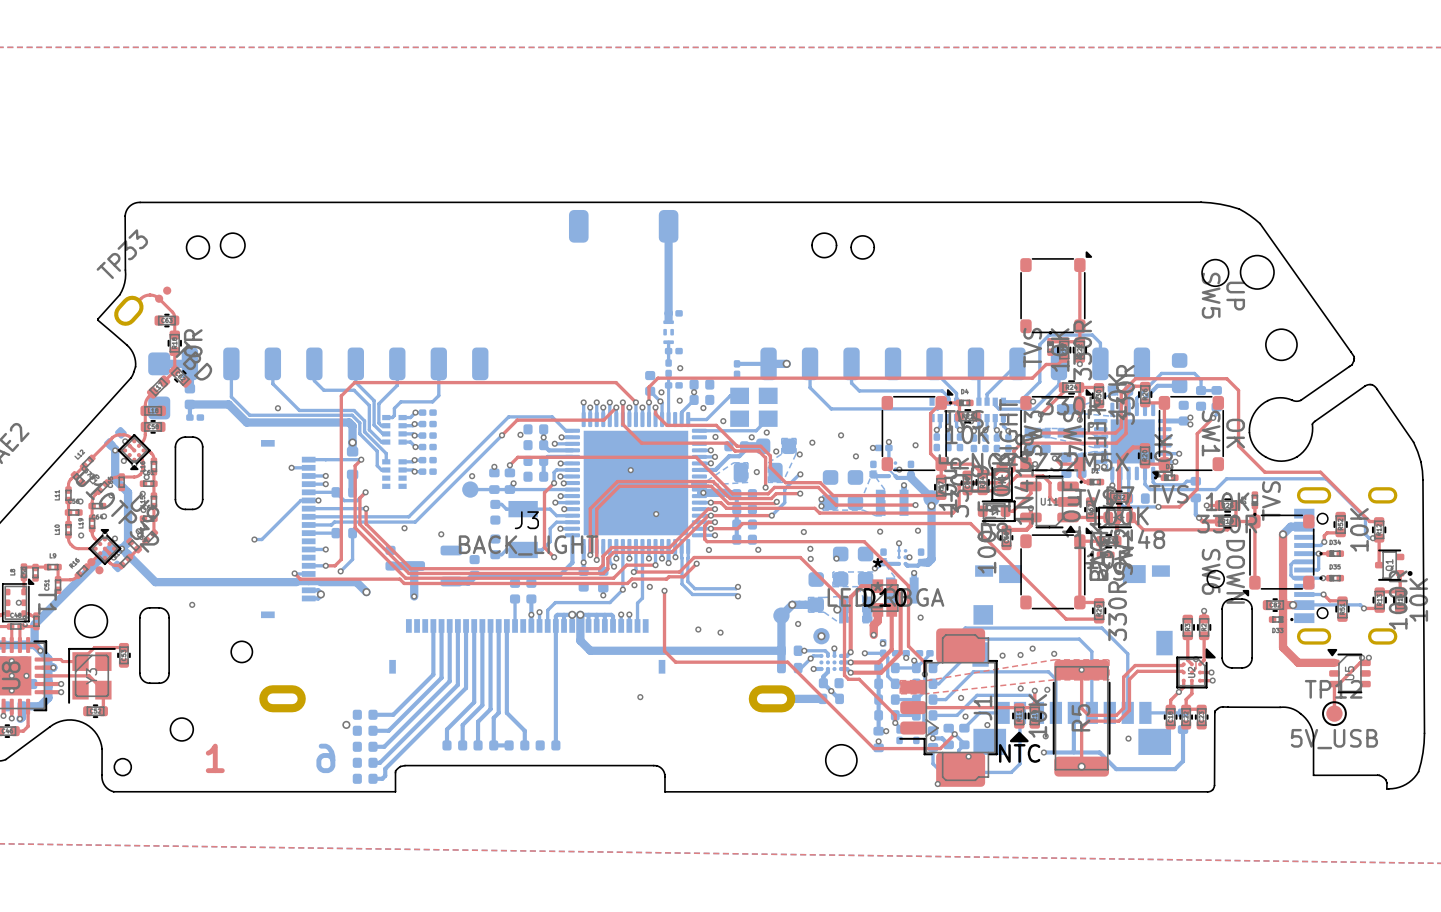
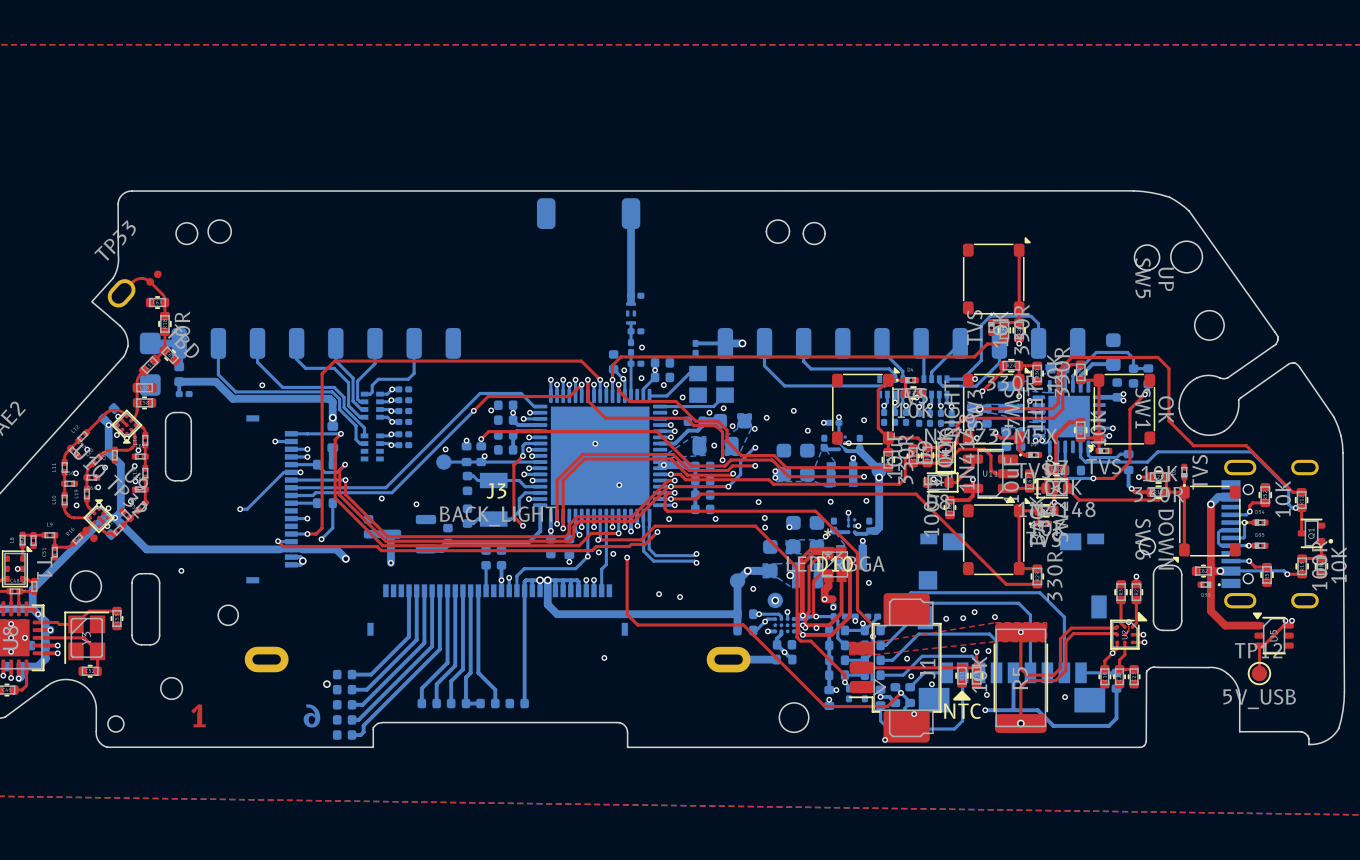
top track: none -> (823, 558) (816, 558) (809, 566) (809, 611) (805, 615) (805, 627)
top track: none -> (846, 557) (837, 549) (810, 549) (801, 558) (801, 612) (798, 615) (798, 631) (802, 634)
top track: none -> (823, 570) (813, 581) (812, 616)
top track: none -> (824, 599) (832, 599)
bottom track: none -> (812, 616) (799, 619)
via: none -> (805, 627)
via: none -> (816, 628)

